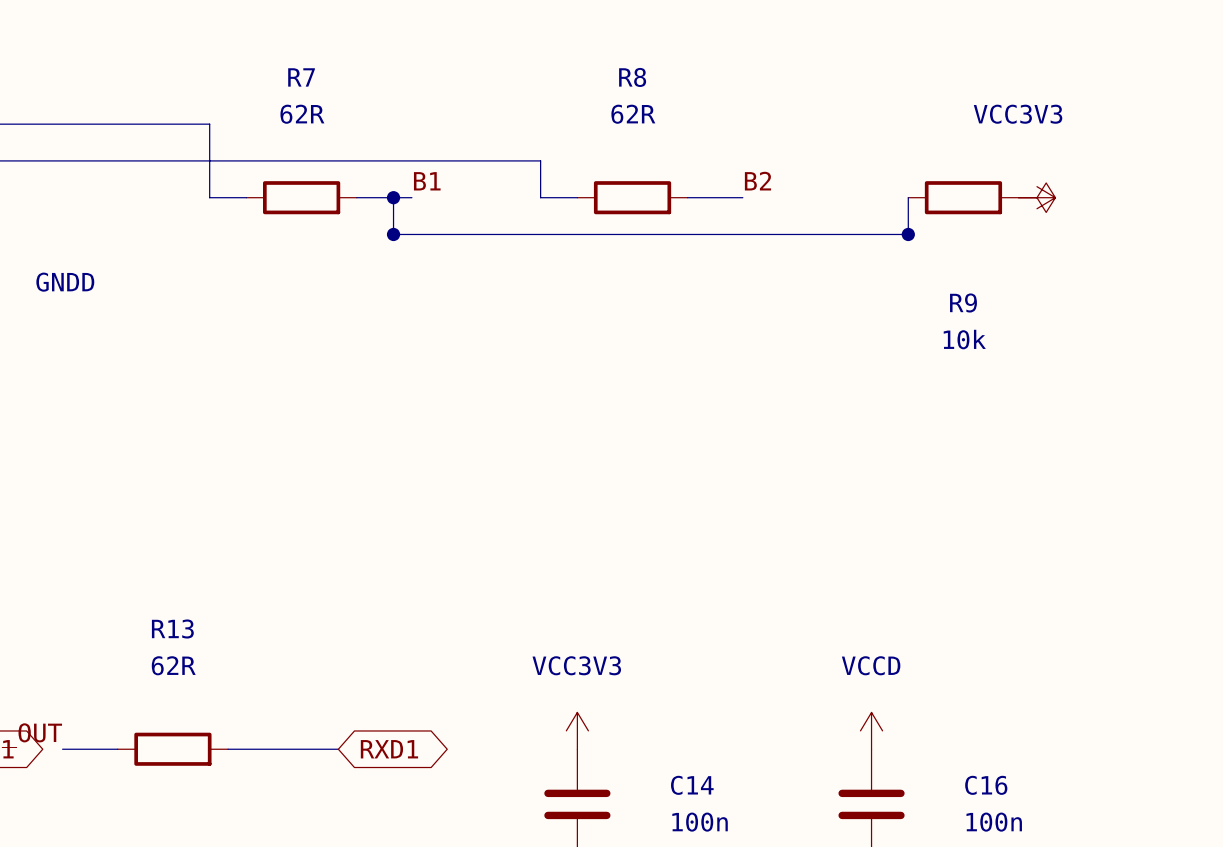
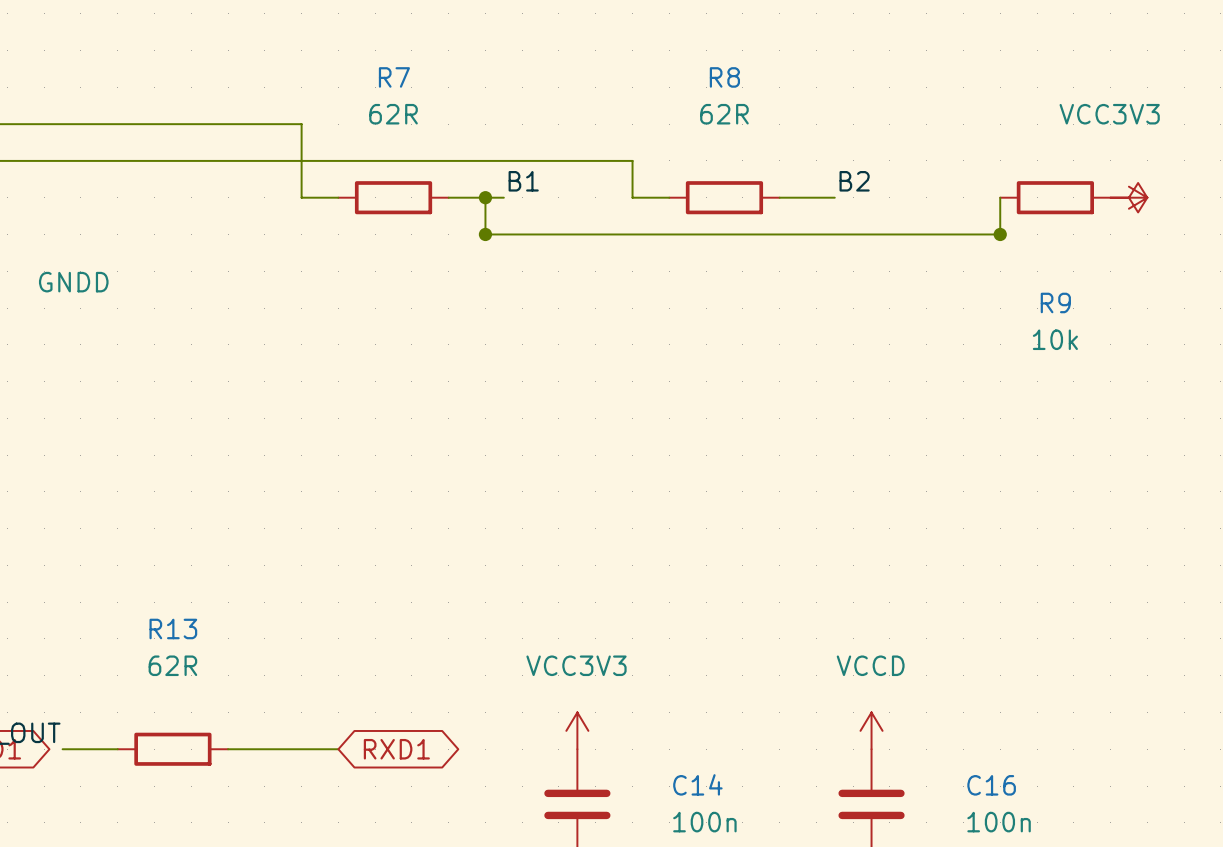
wire: (209, 124) (209, 197) (246, 197) -> (209, 124) (301, 124) (301, 197) (338, 197)
wire: (540, 160) (540, 197) (577, 197) -> (540, 160) (632, 160) (632, 197) (669, 197)
label position: B1 (427, 181) -> B1 (523, 181)
label position: B2 (757, 181) -> B2 (854, 181)
R7 position: (301, 197) -> (393, 197)
wire: (356, 197) (411, 197) -> (448, 197) (503, 197)
wire: (393, 197) (393, 234) (485, 234) -> (485, 197) (485, 234)
junction: (393, 197) -> none
junction: none -> (485, 197)
R8 position: (632, 197) -> (724, 197)
wire: (687, 197) (742, 197) -> (779, 197) (834, 197)
wire: (908, 197) (908, 234) -> (1000, 197) (1000, 234) (908, 234)
R9 position: (963, 197) -> (1055, 197)
power symbol position: (1037, 197) -> (1128, 197)
power symbol position: VCC3V3 (1037, 197) -> VCC3V3 (1128, 197)
junction: (393, 234) -> none
junction: none -> (485, 234)
junction: (908, 234) -> none
junction: none -> (1000, 234)

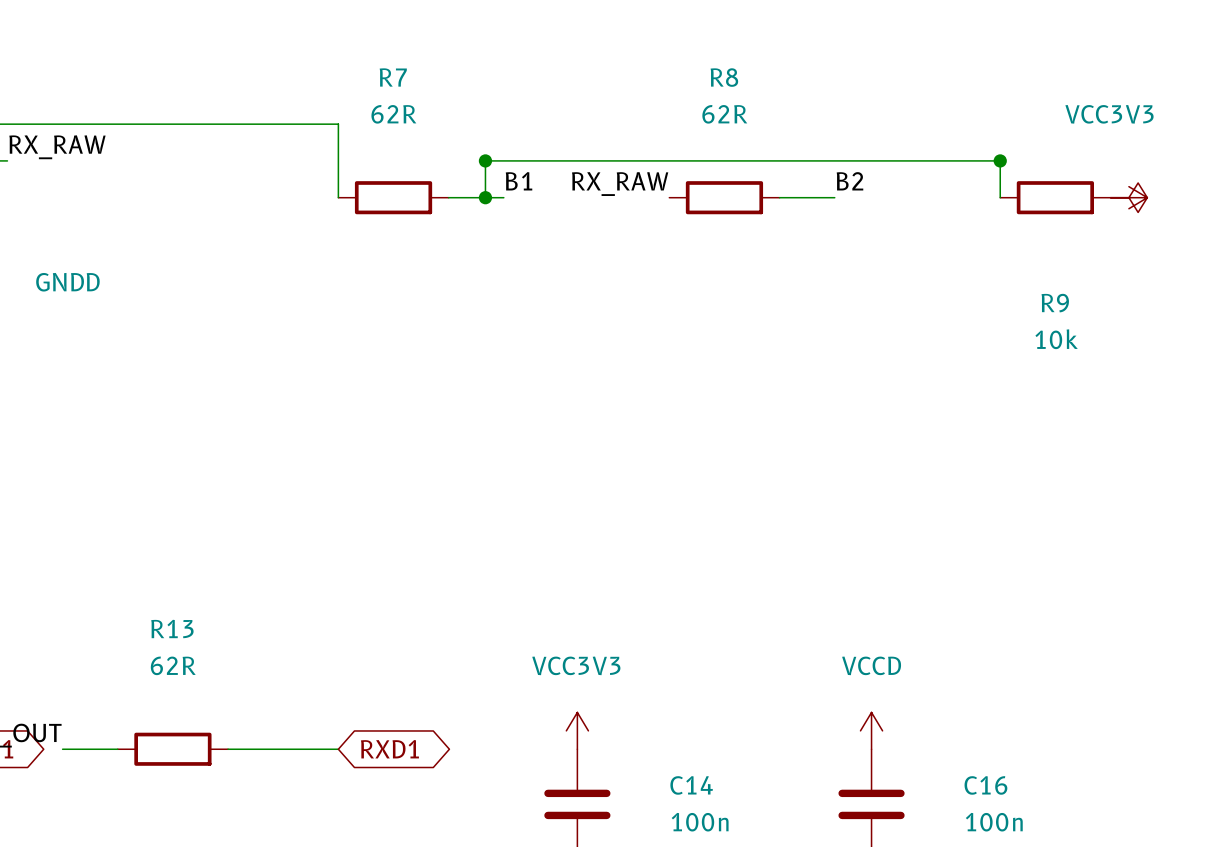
wire: (301, 124) (301, 197) (338, 197) -> (301, 124) (338, 124) (338, 197)
label: none -> RX_RAW (57, 147)
wire: (7, 160) (485, 160) -> (485, 197) (485, 160)
wire: (632, 160) (632, 197) (669, 197) -> none
label: none -> RX_RAW (620, 184)
wire: (485, 197) (485, 234) (1000, 234) (1000, 197) -> (632, 160) (1000, 160) (1000, 197)
junction position: (485, 234) -> (485, 160)
junction position: (1000, 234) -> (1000, 160)

